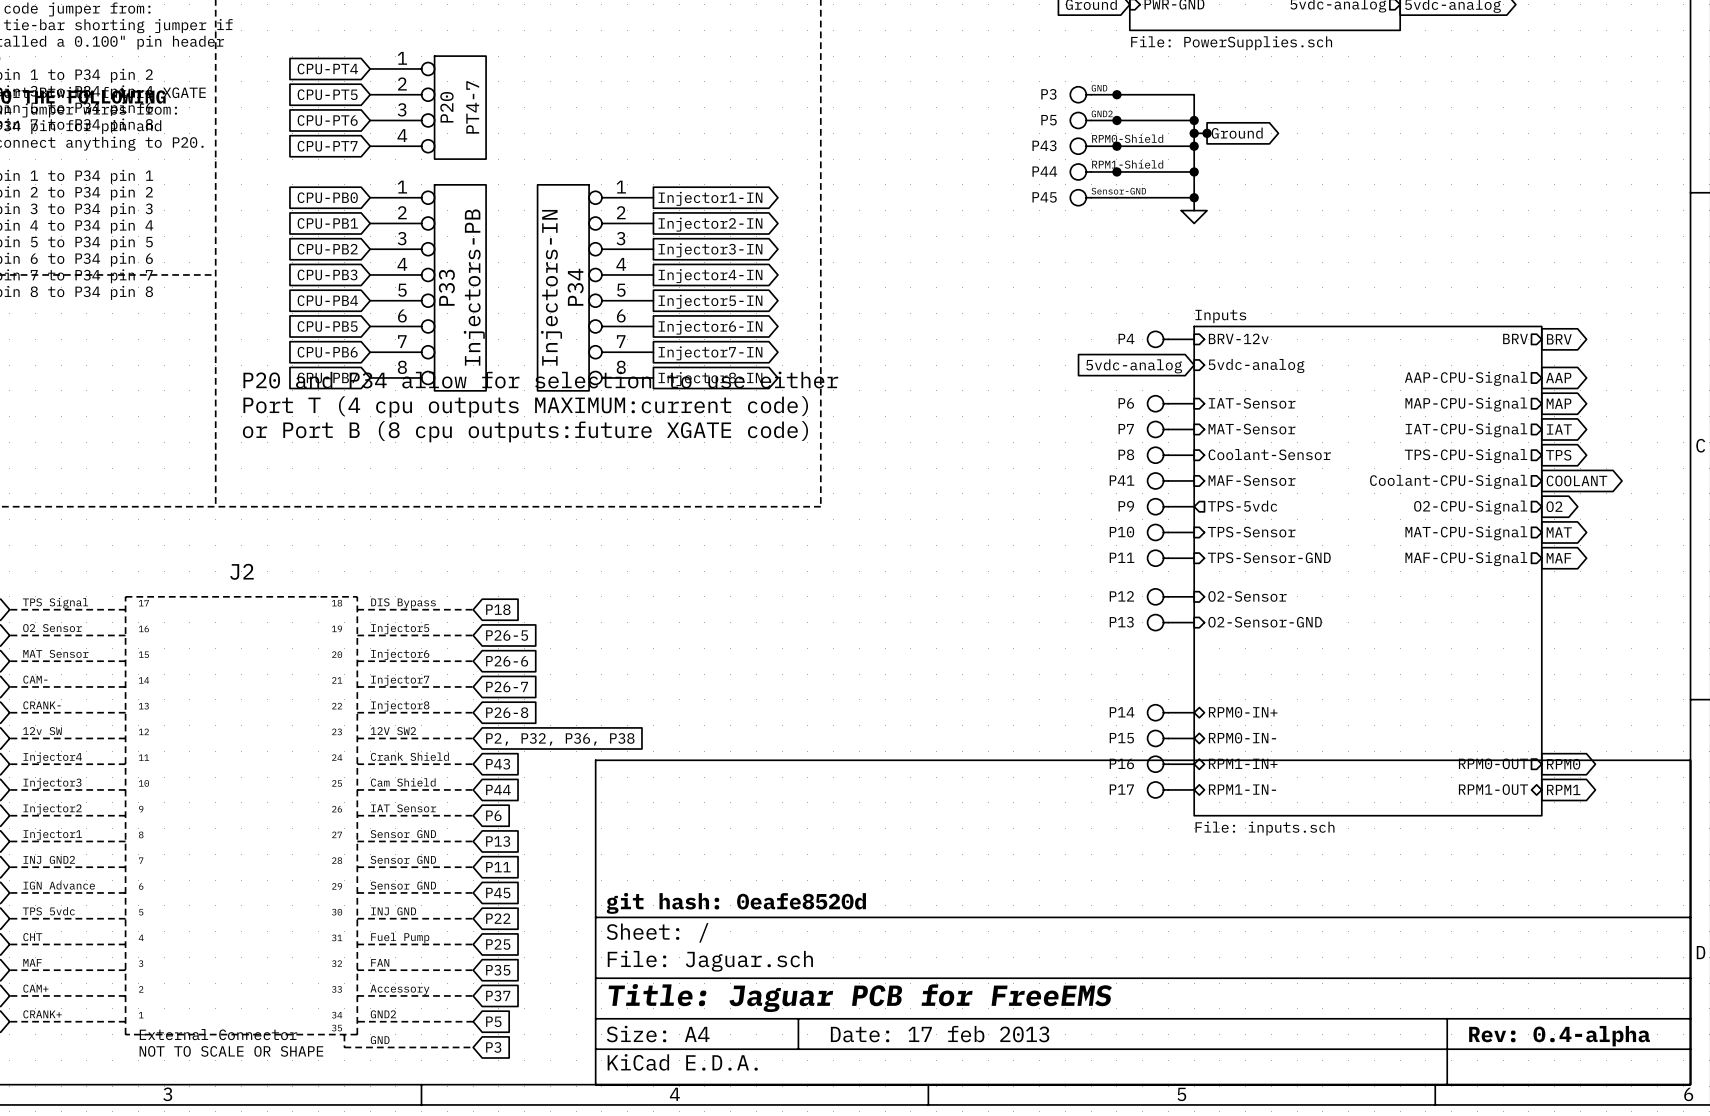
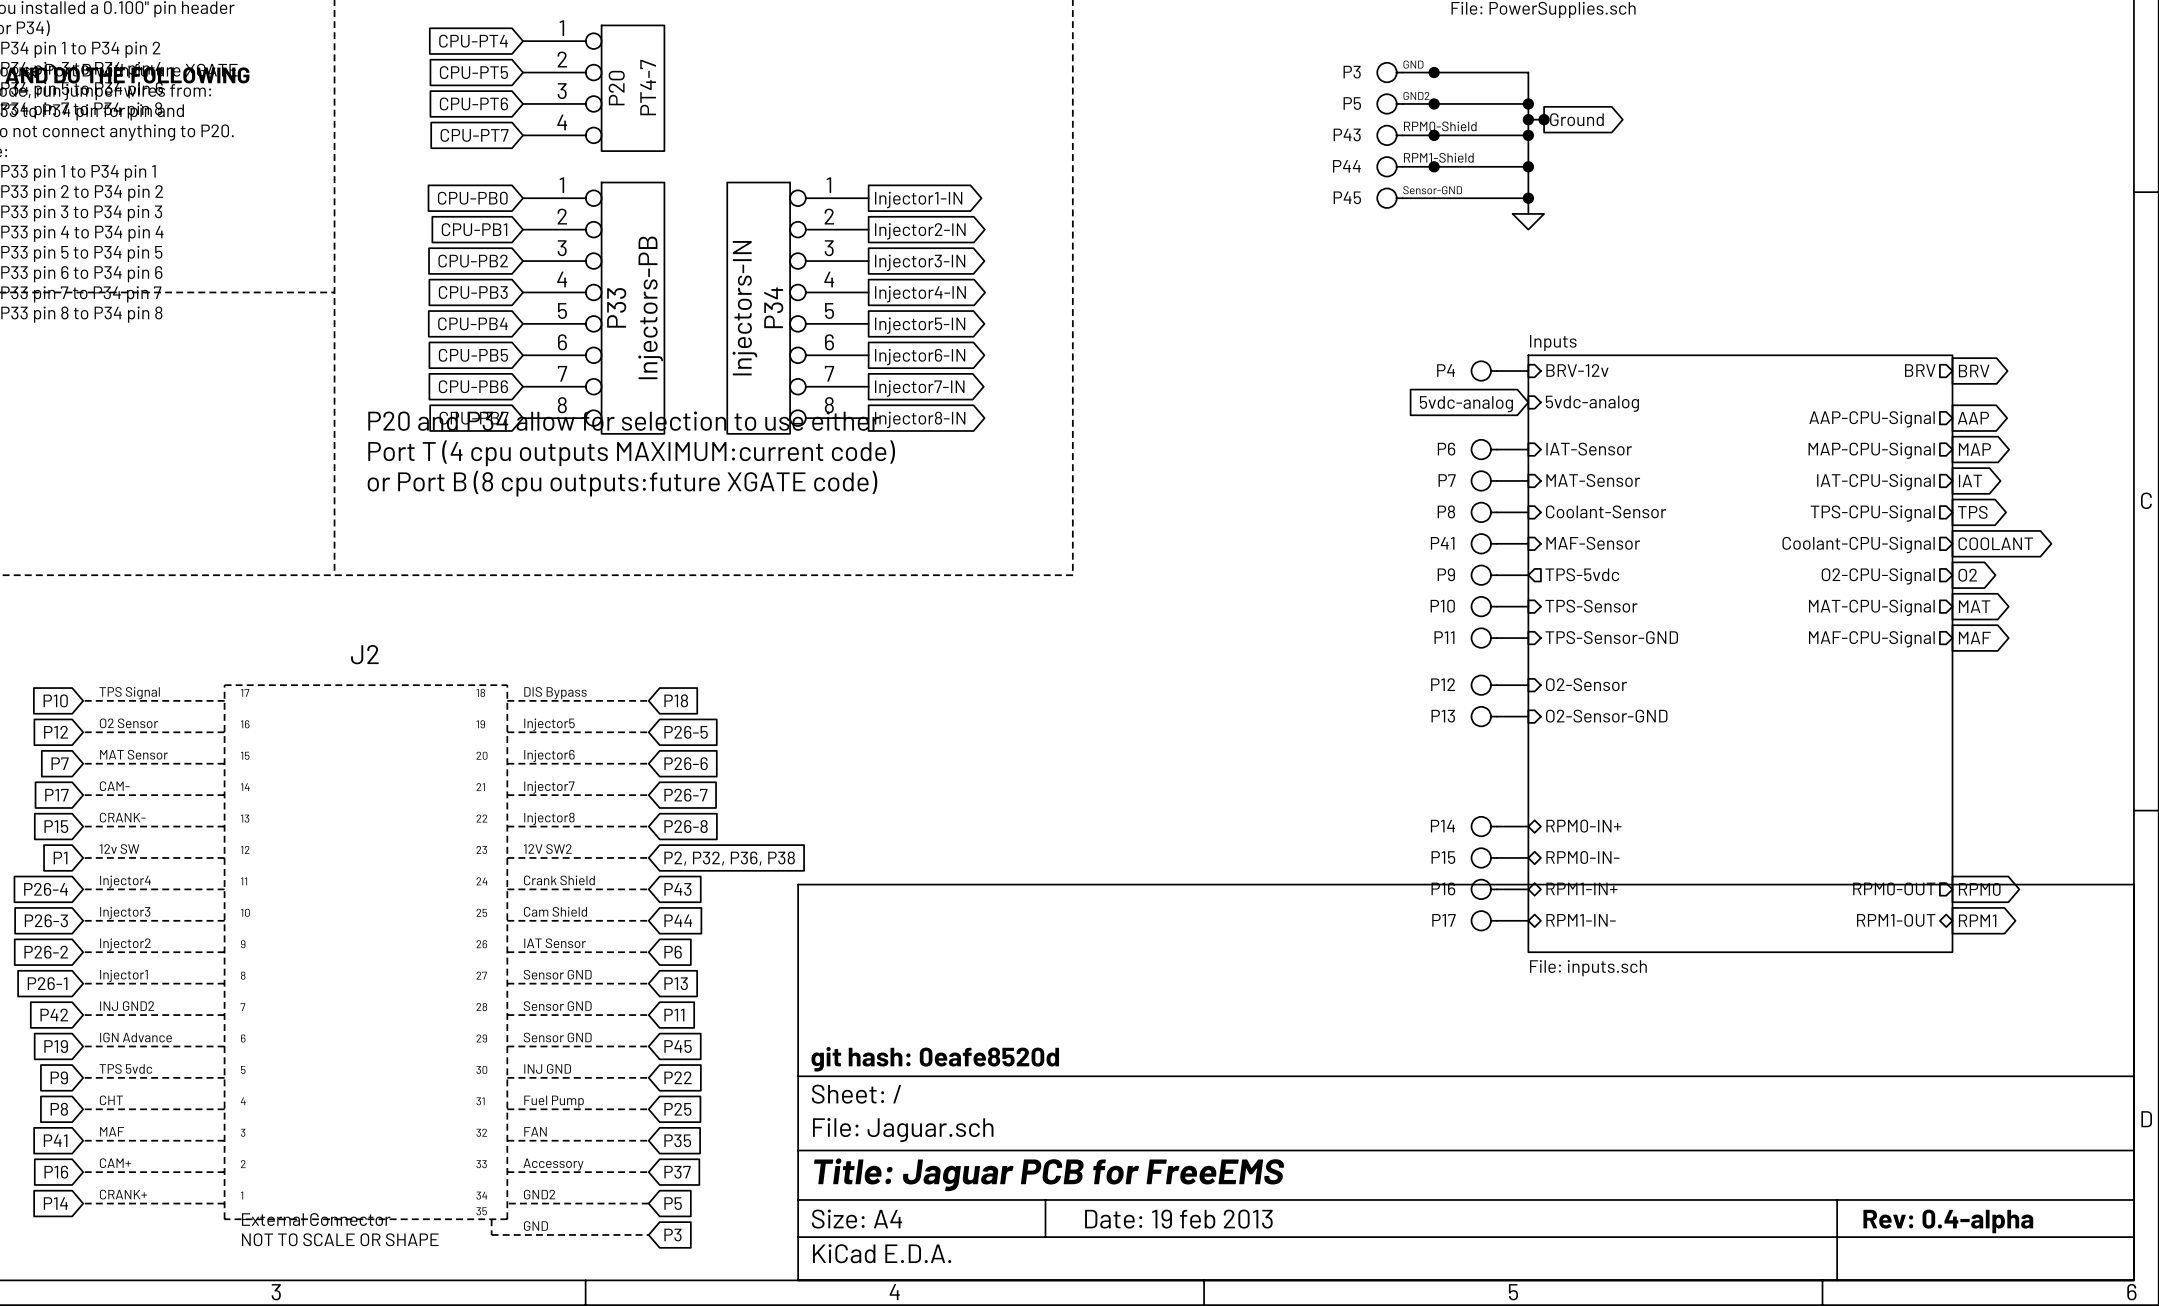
title block: Date: 17 feb 2013 (940, 1034) -> Date: 19 feb 2013 (1178, 1219)

